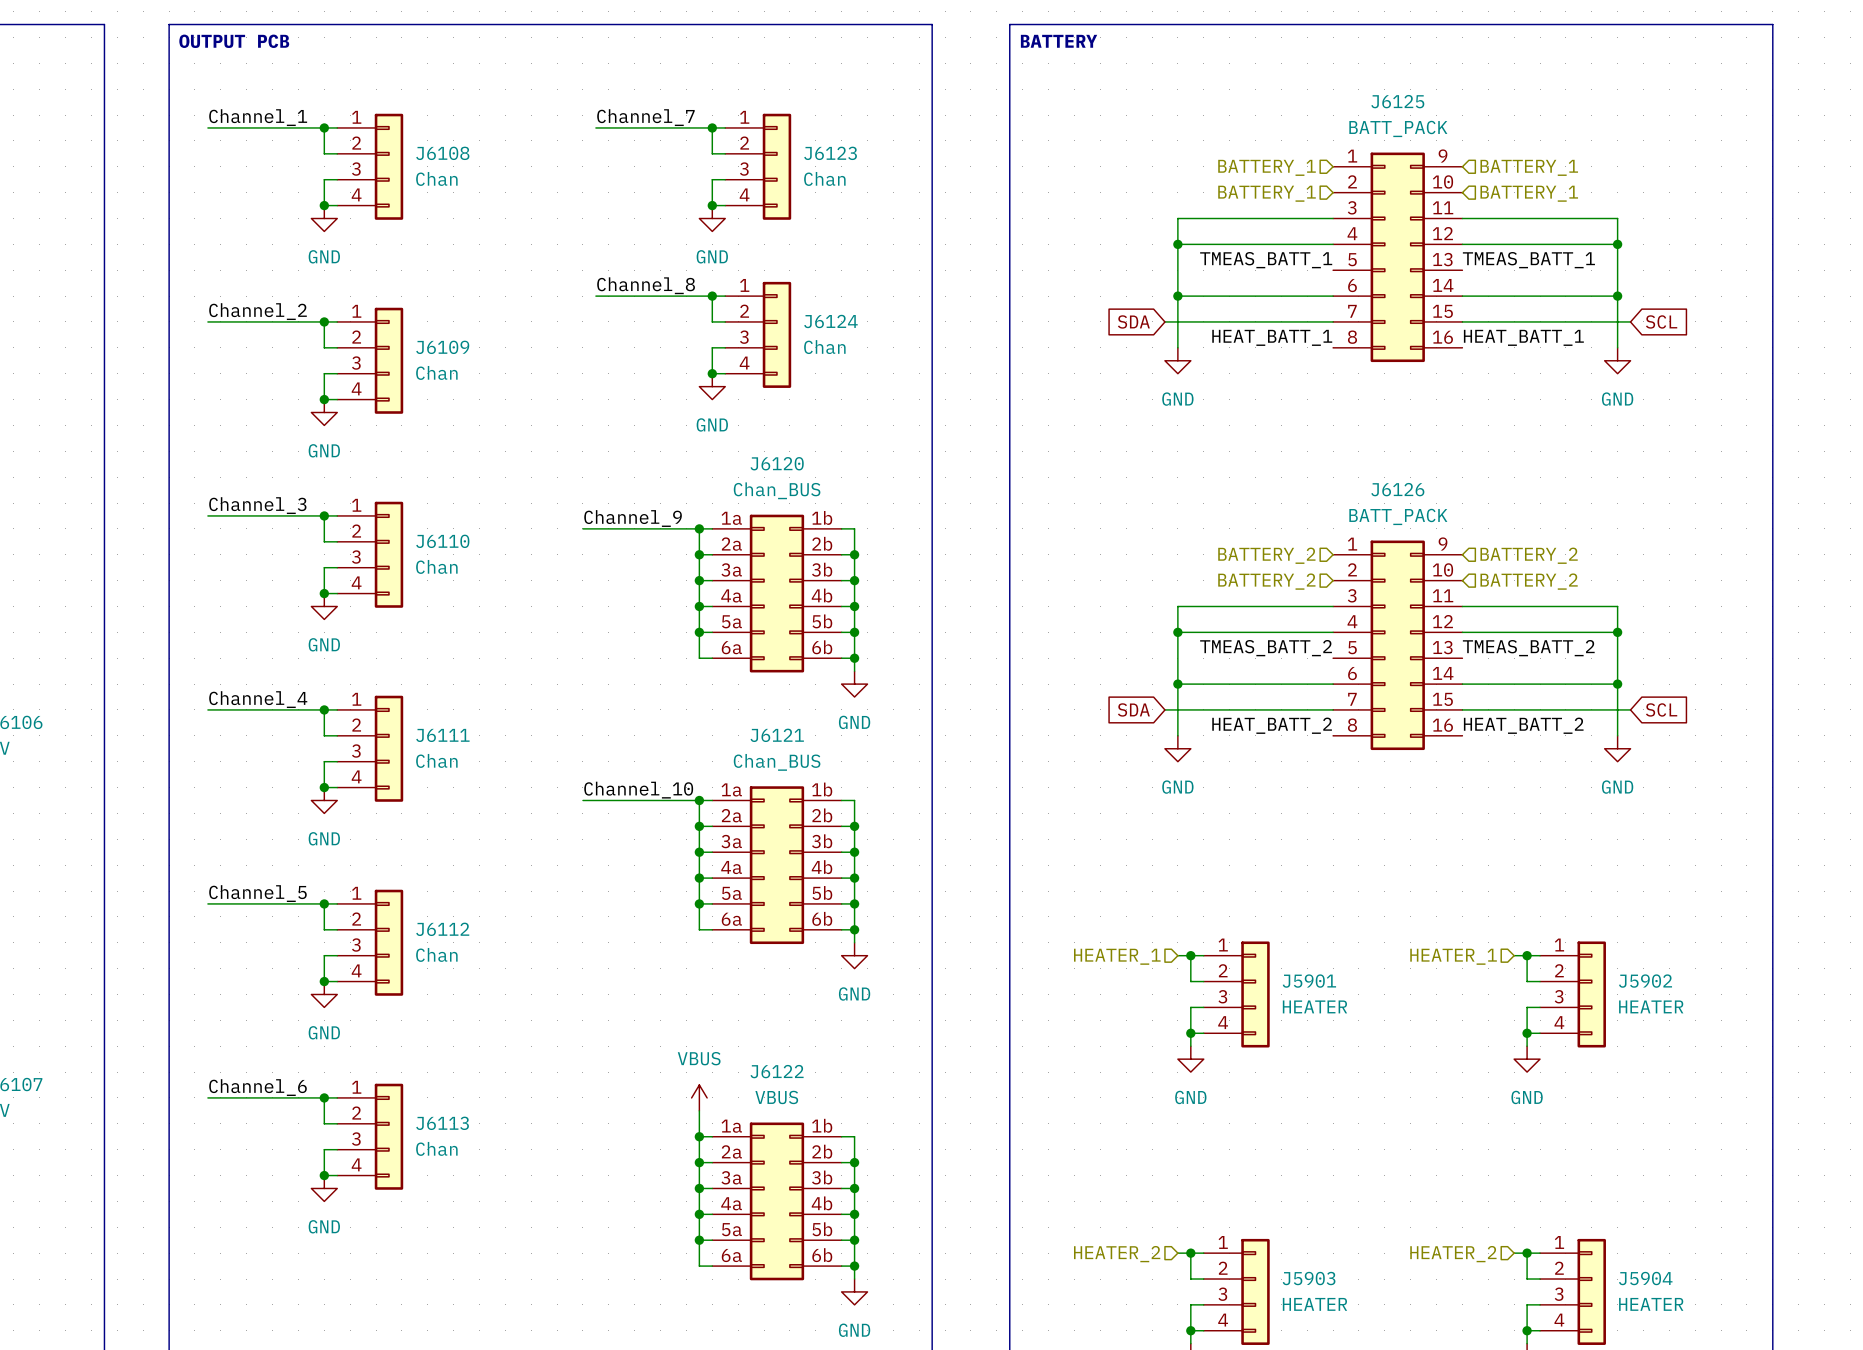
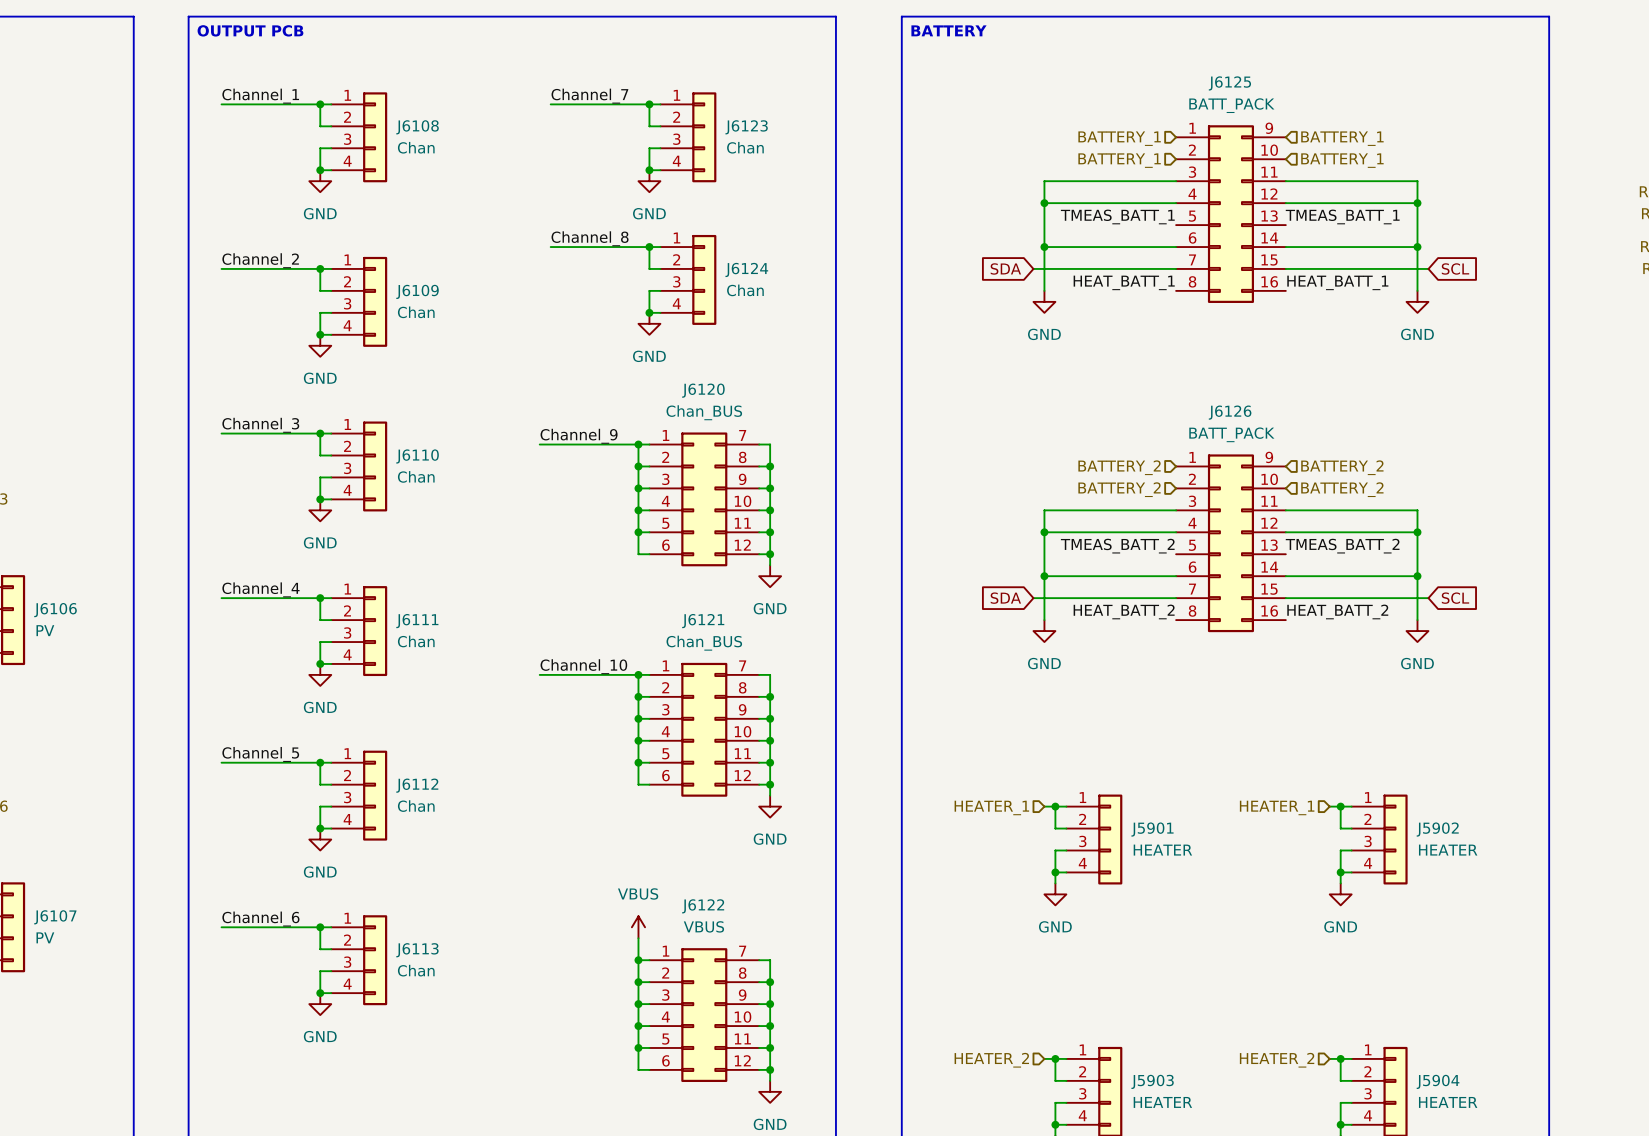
J6120 symbol: [712, 514, 842, 673] -> [649, 432, 760, 567]
J6121 symbol: [712, 786, 842, 945] -> [649, 662, 760, 797]
J6122 symbol: [712, 1122, 842, 1281] -> [649, 948, 760, 1083]

